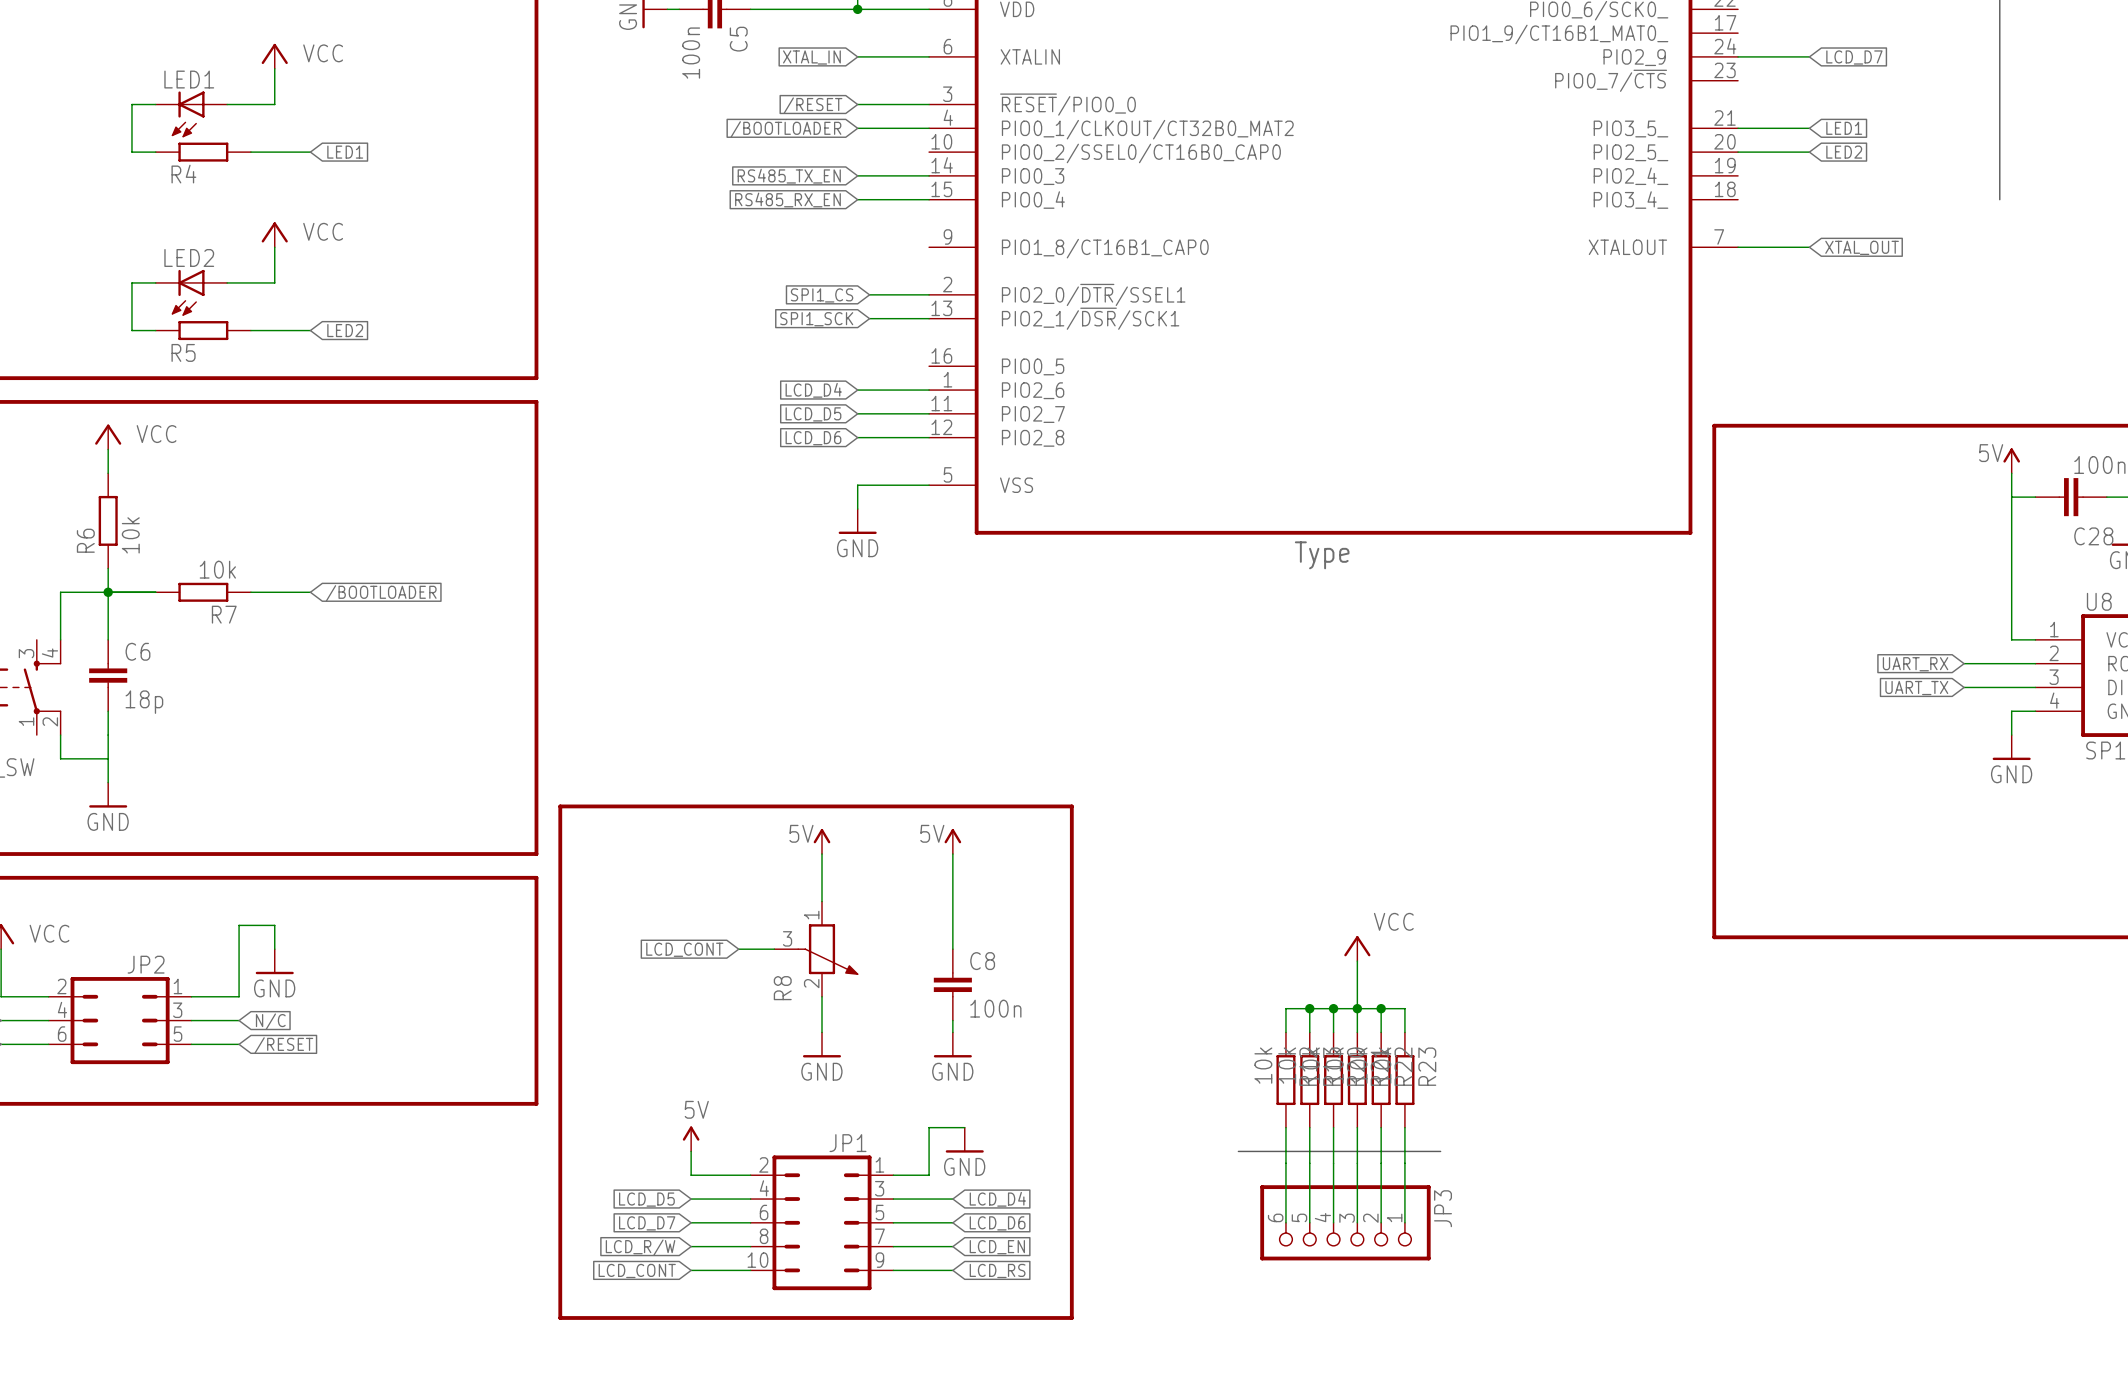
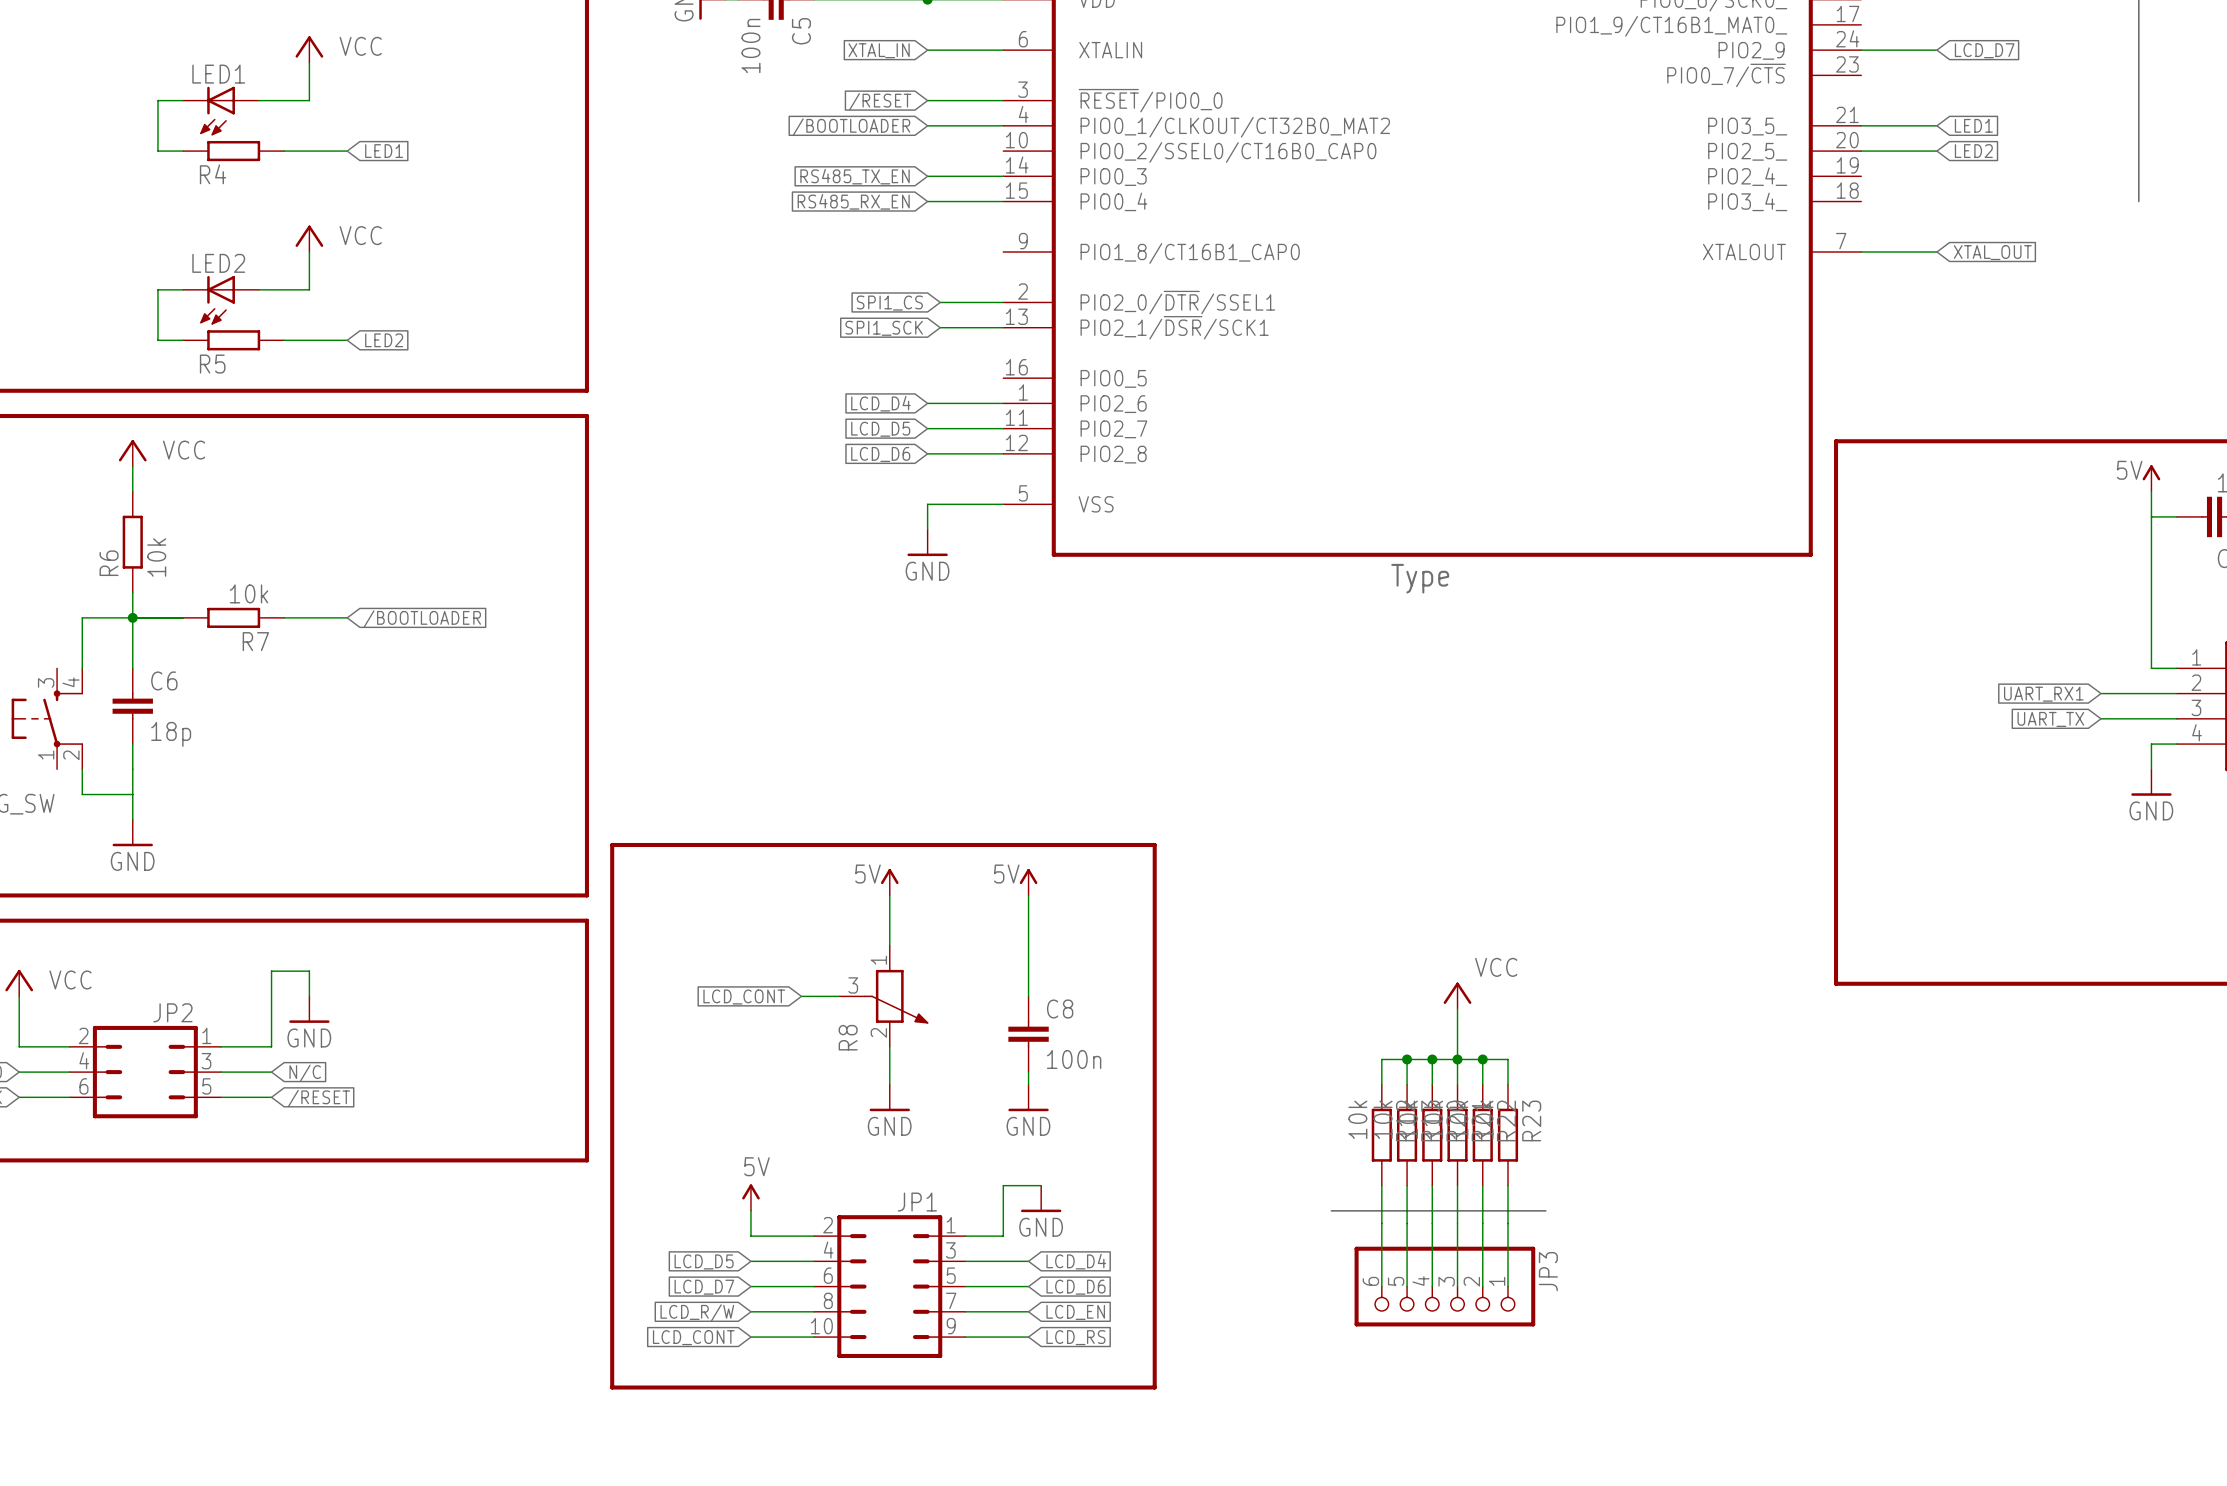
global label: UART_RX (1915, 664) -> UART_RX1 (2043, 694)

